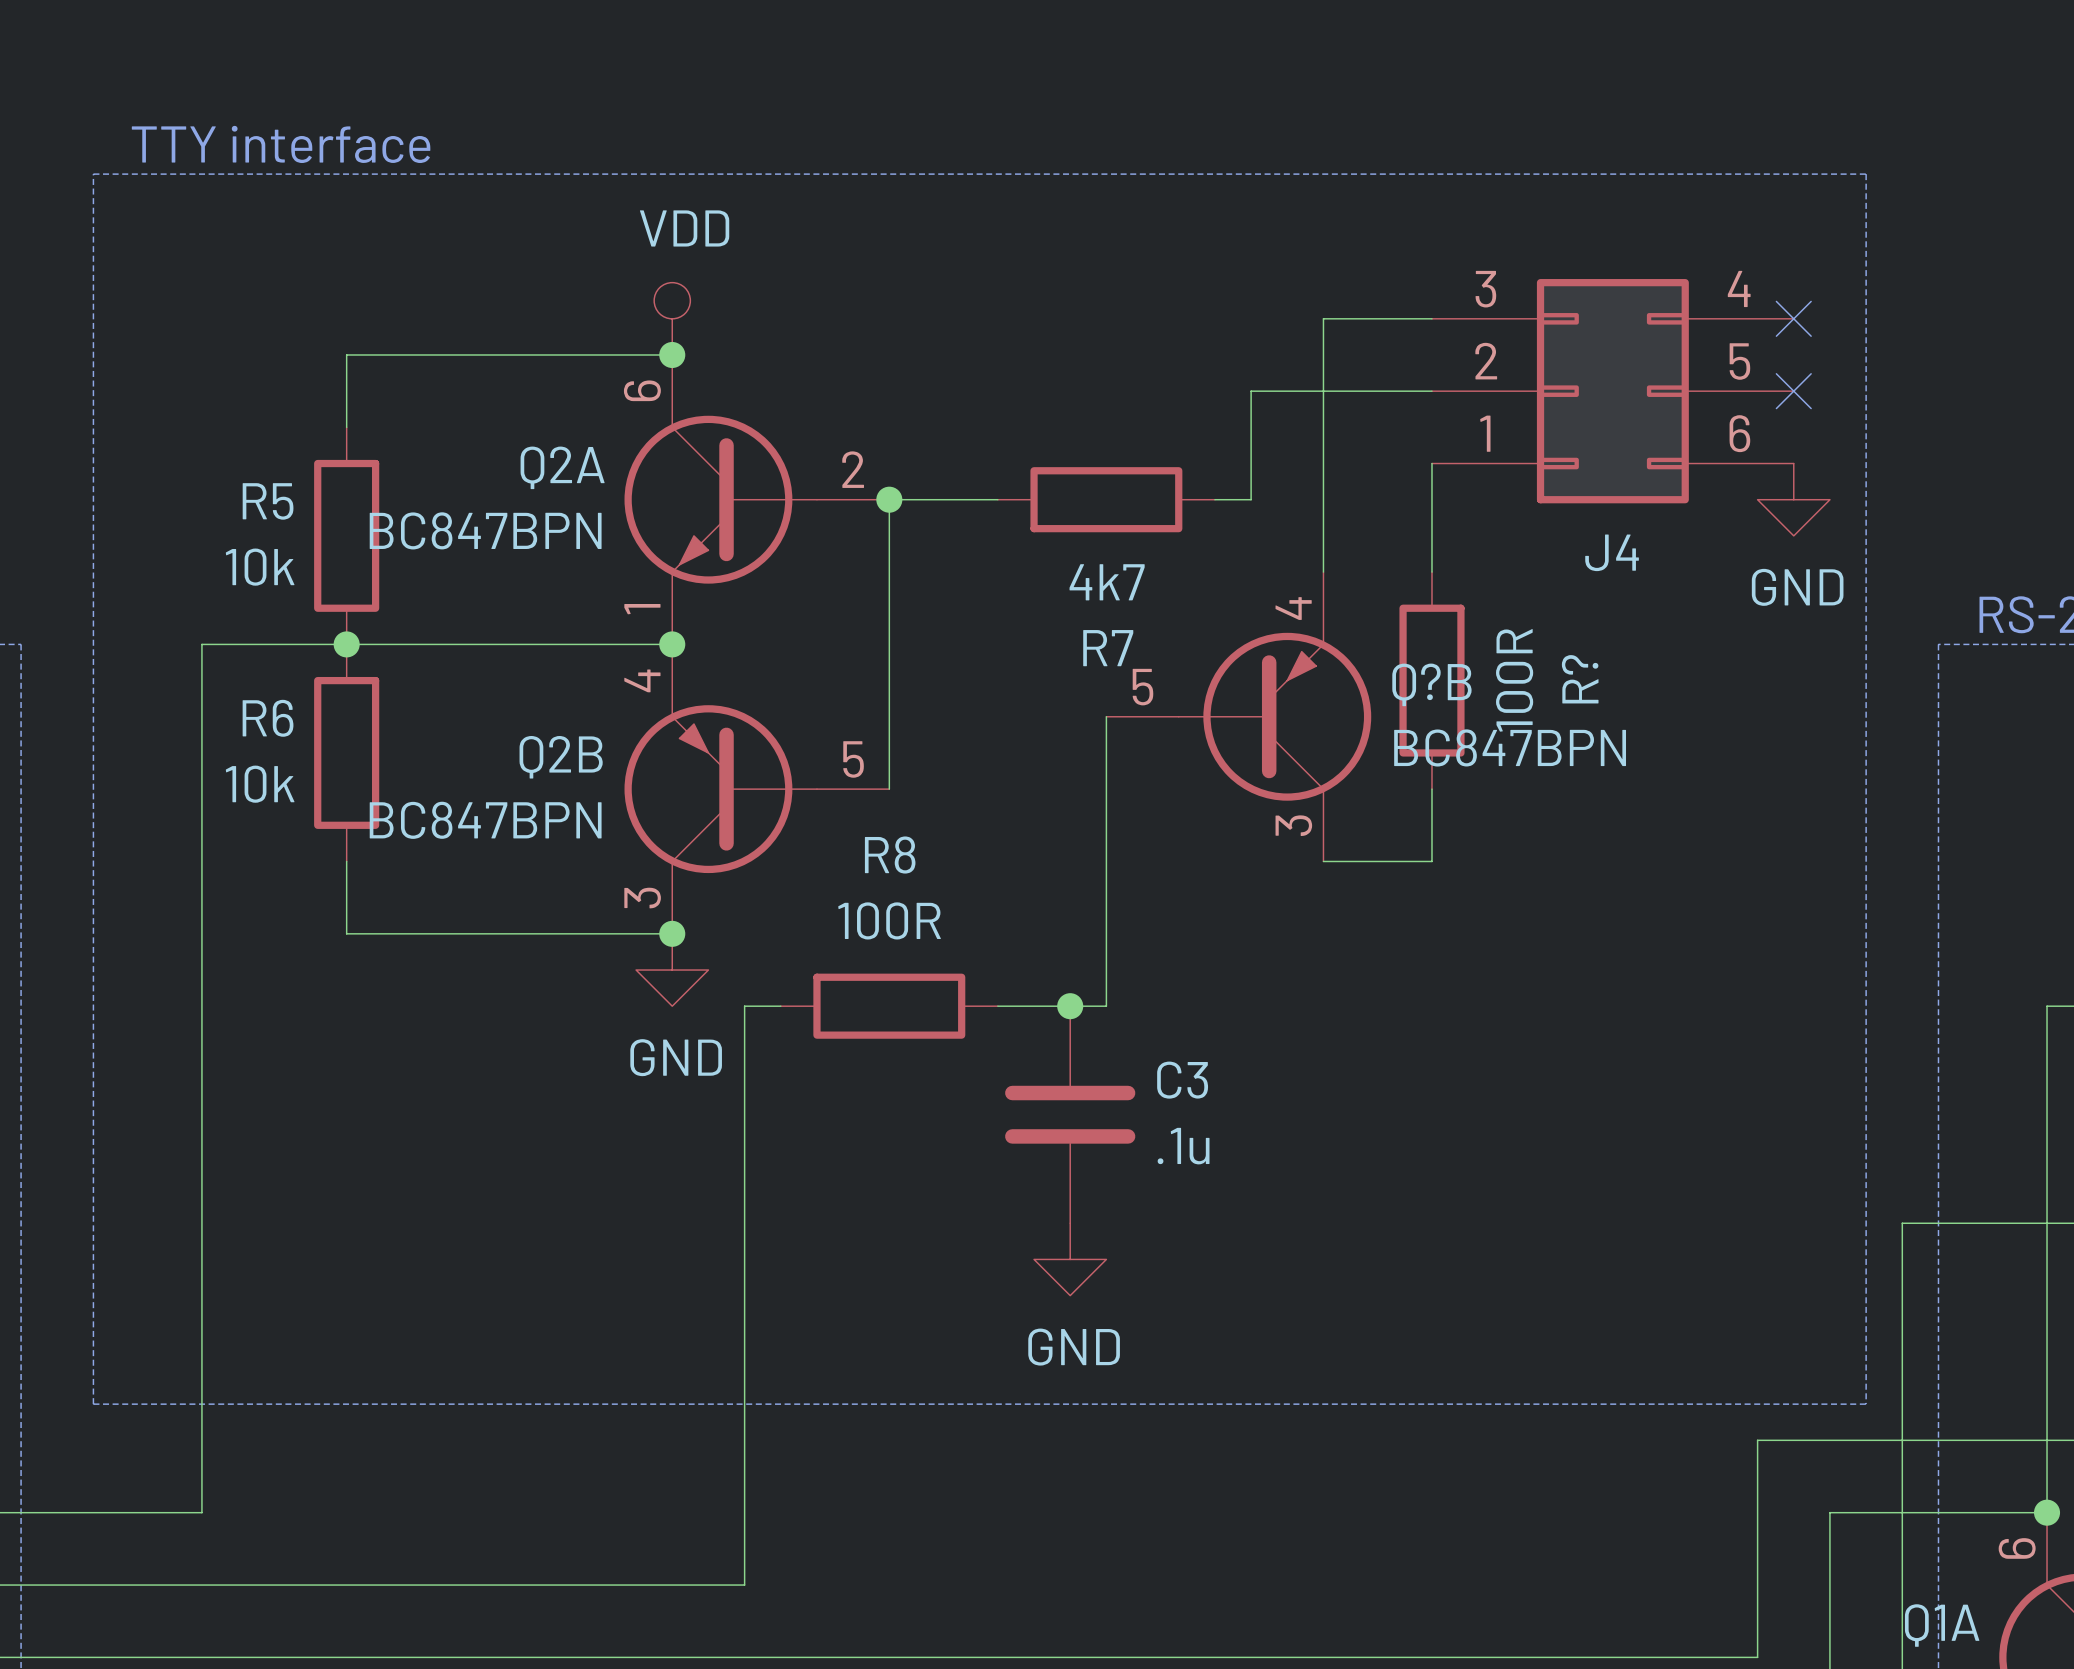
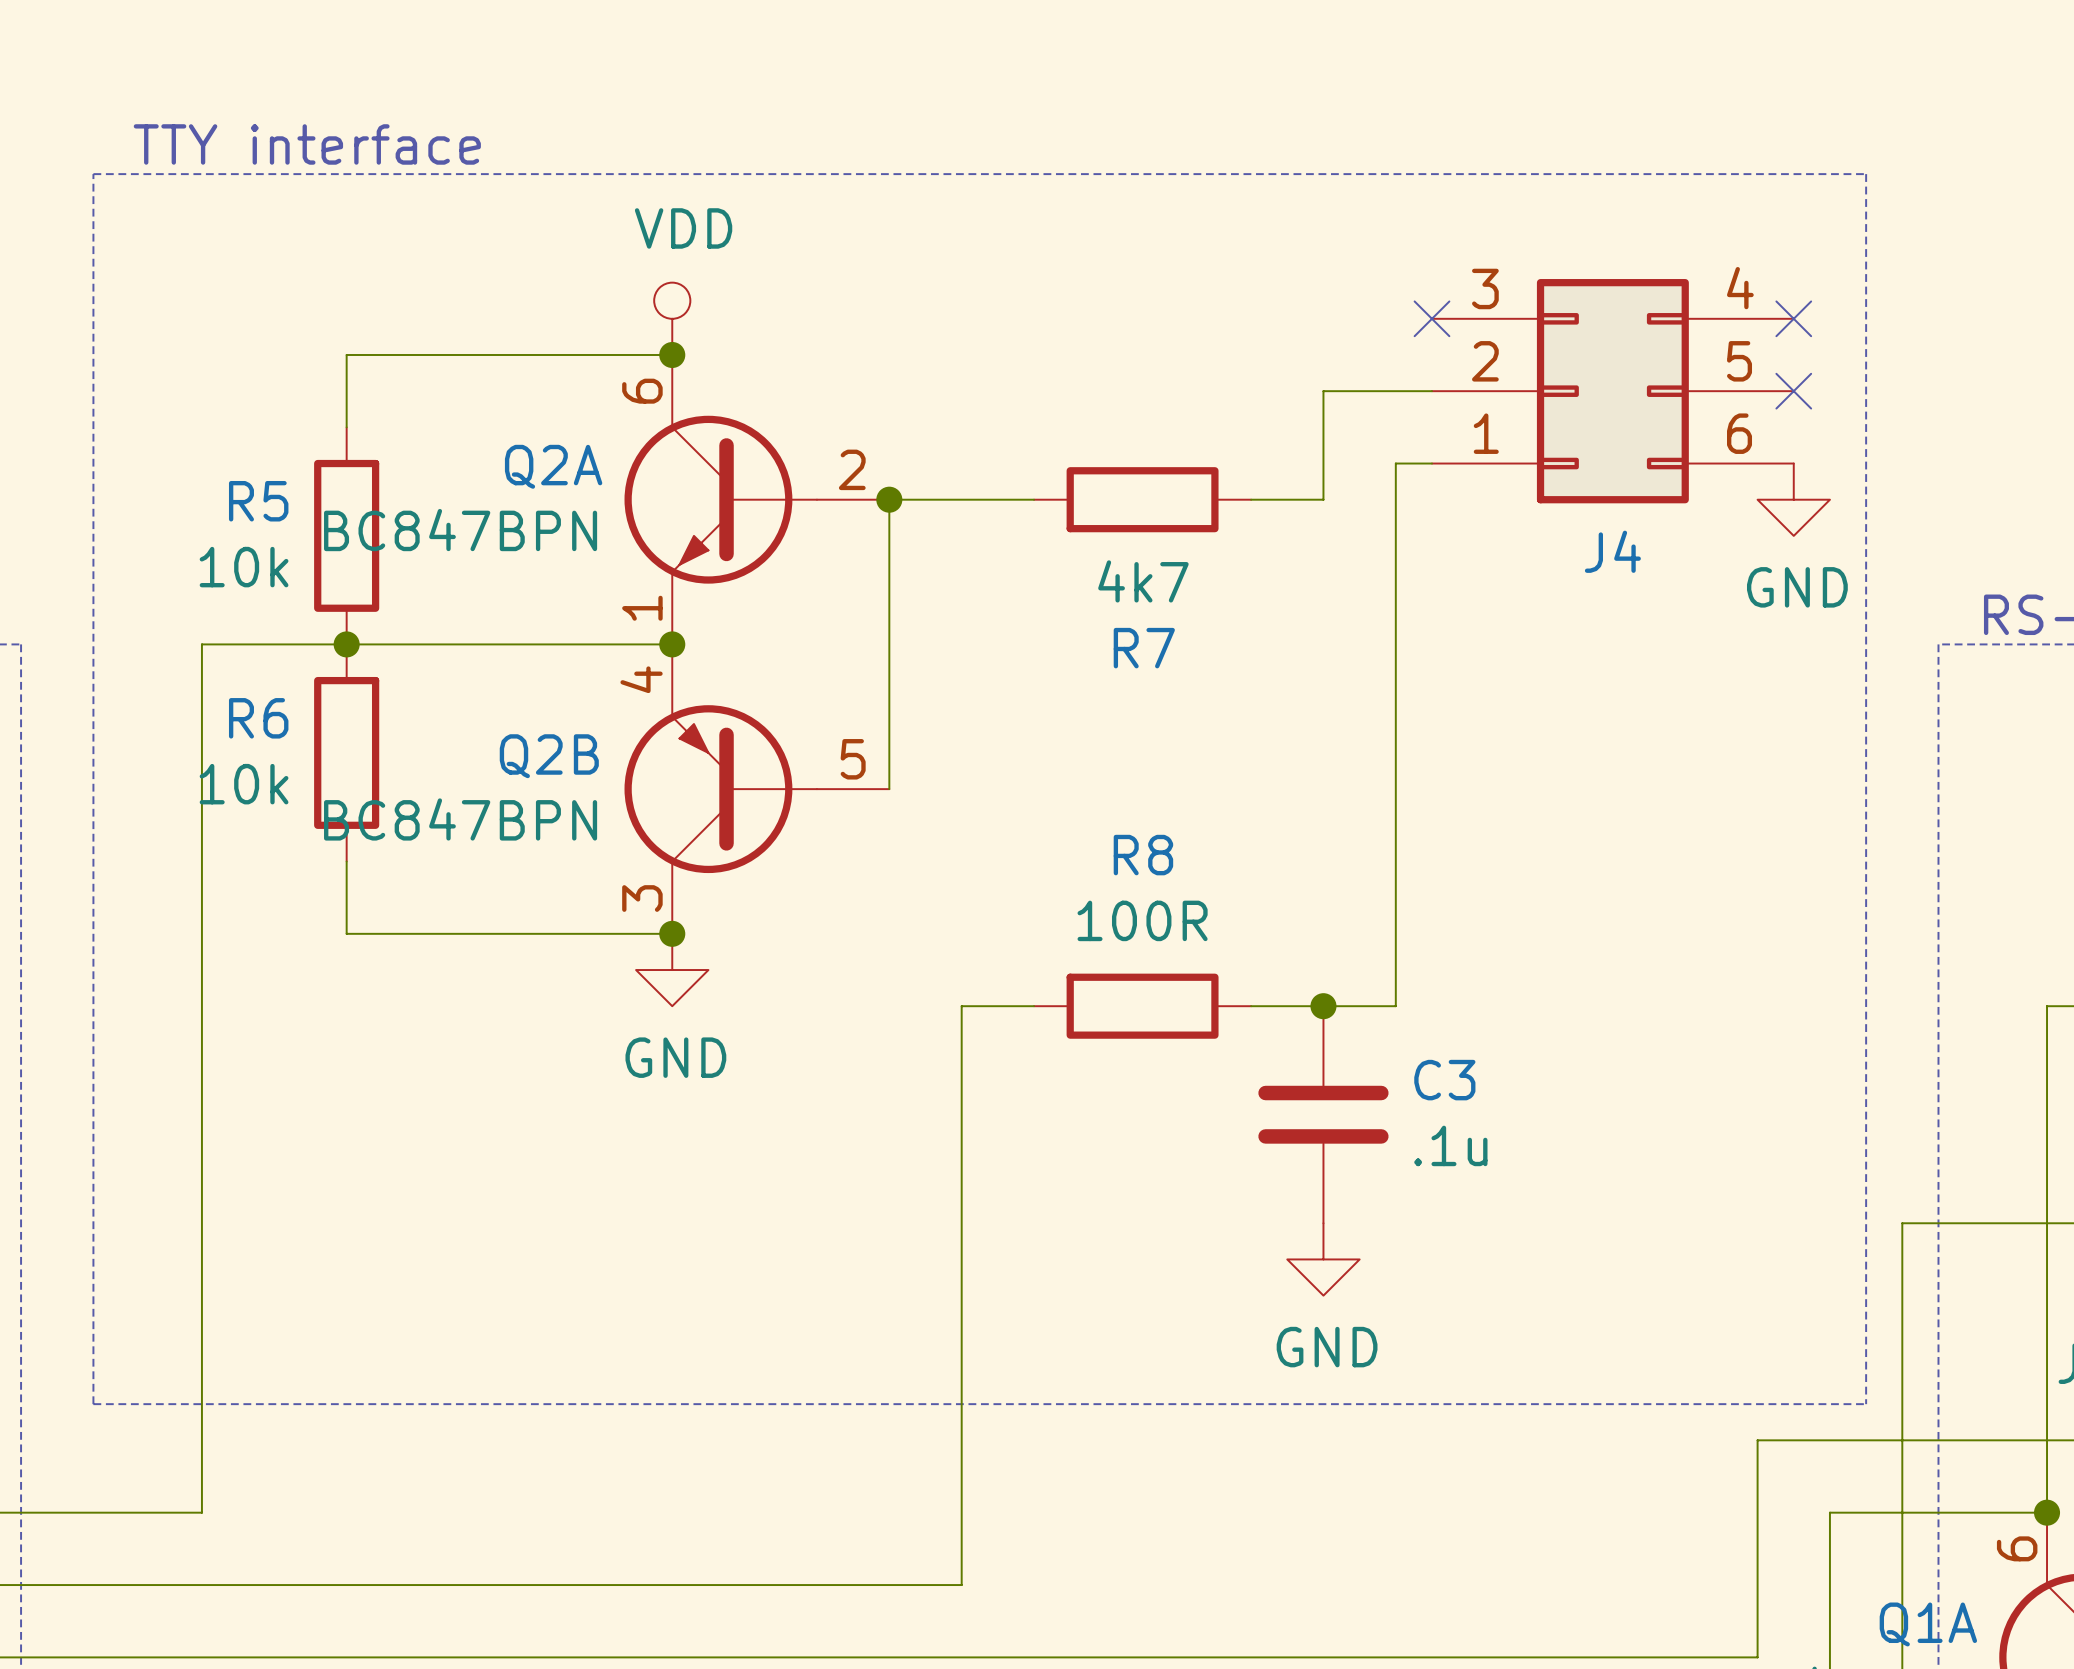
wire: (1431, 318) (1323, 318) (1323, 391) (1251, 391) (1251, 499) (1214, 499) -> none
no-connect mark: none -> (1431, 318)
wire: (1431, 463) (1431, 572) -> (1431, 463) (1395, 463) (1395, 1006) (1251, 1006)
R7 position: (1106, 499) -> (1142, 499)
wire: (1323, 499) (1323, 572) -> (1323, 499) (1251, 499)
R?: 100R (1431, 680) -> none
wire: (1106, 716) (1106, 1006) (1034, 1006) -> none
Q?B: BC847BPN (1238, 716) -> none
wire: (1431, 789) (1431, 861) (1323, 861) -> none
wire: (780, 1006) (744, 1006) (744, 1585) -> (997, 1006) (961, 1006) (961, 1585) (744, 1585)
R8 position: (889, 1006) -> (1142, 1006)
junction: (1070, 1006) -> none
junction: none -> (1323, 1006)
C3 position: (1070, 1114) -> (1323, 1114)
power symbol position: GND (1070, 1259) -> GND (1323, 1259)

